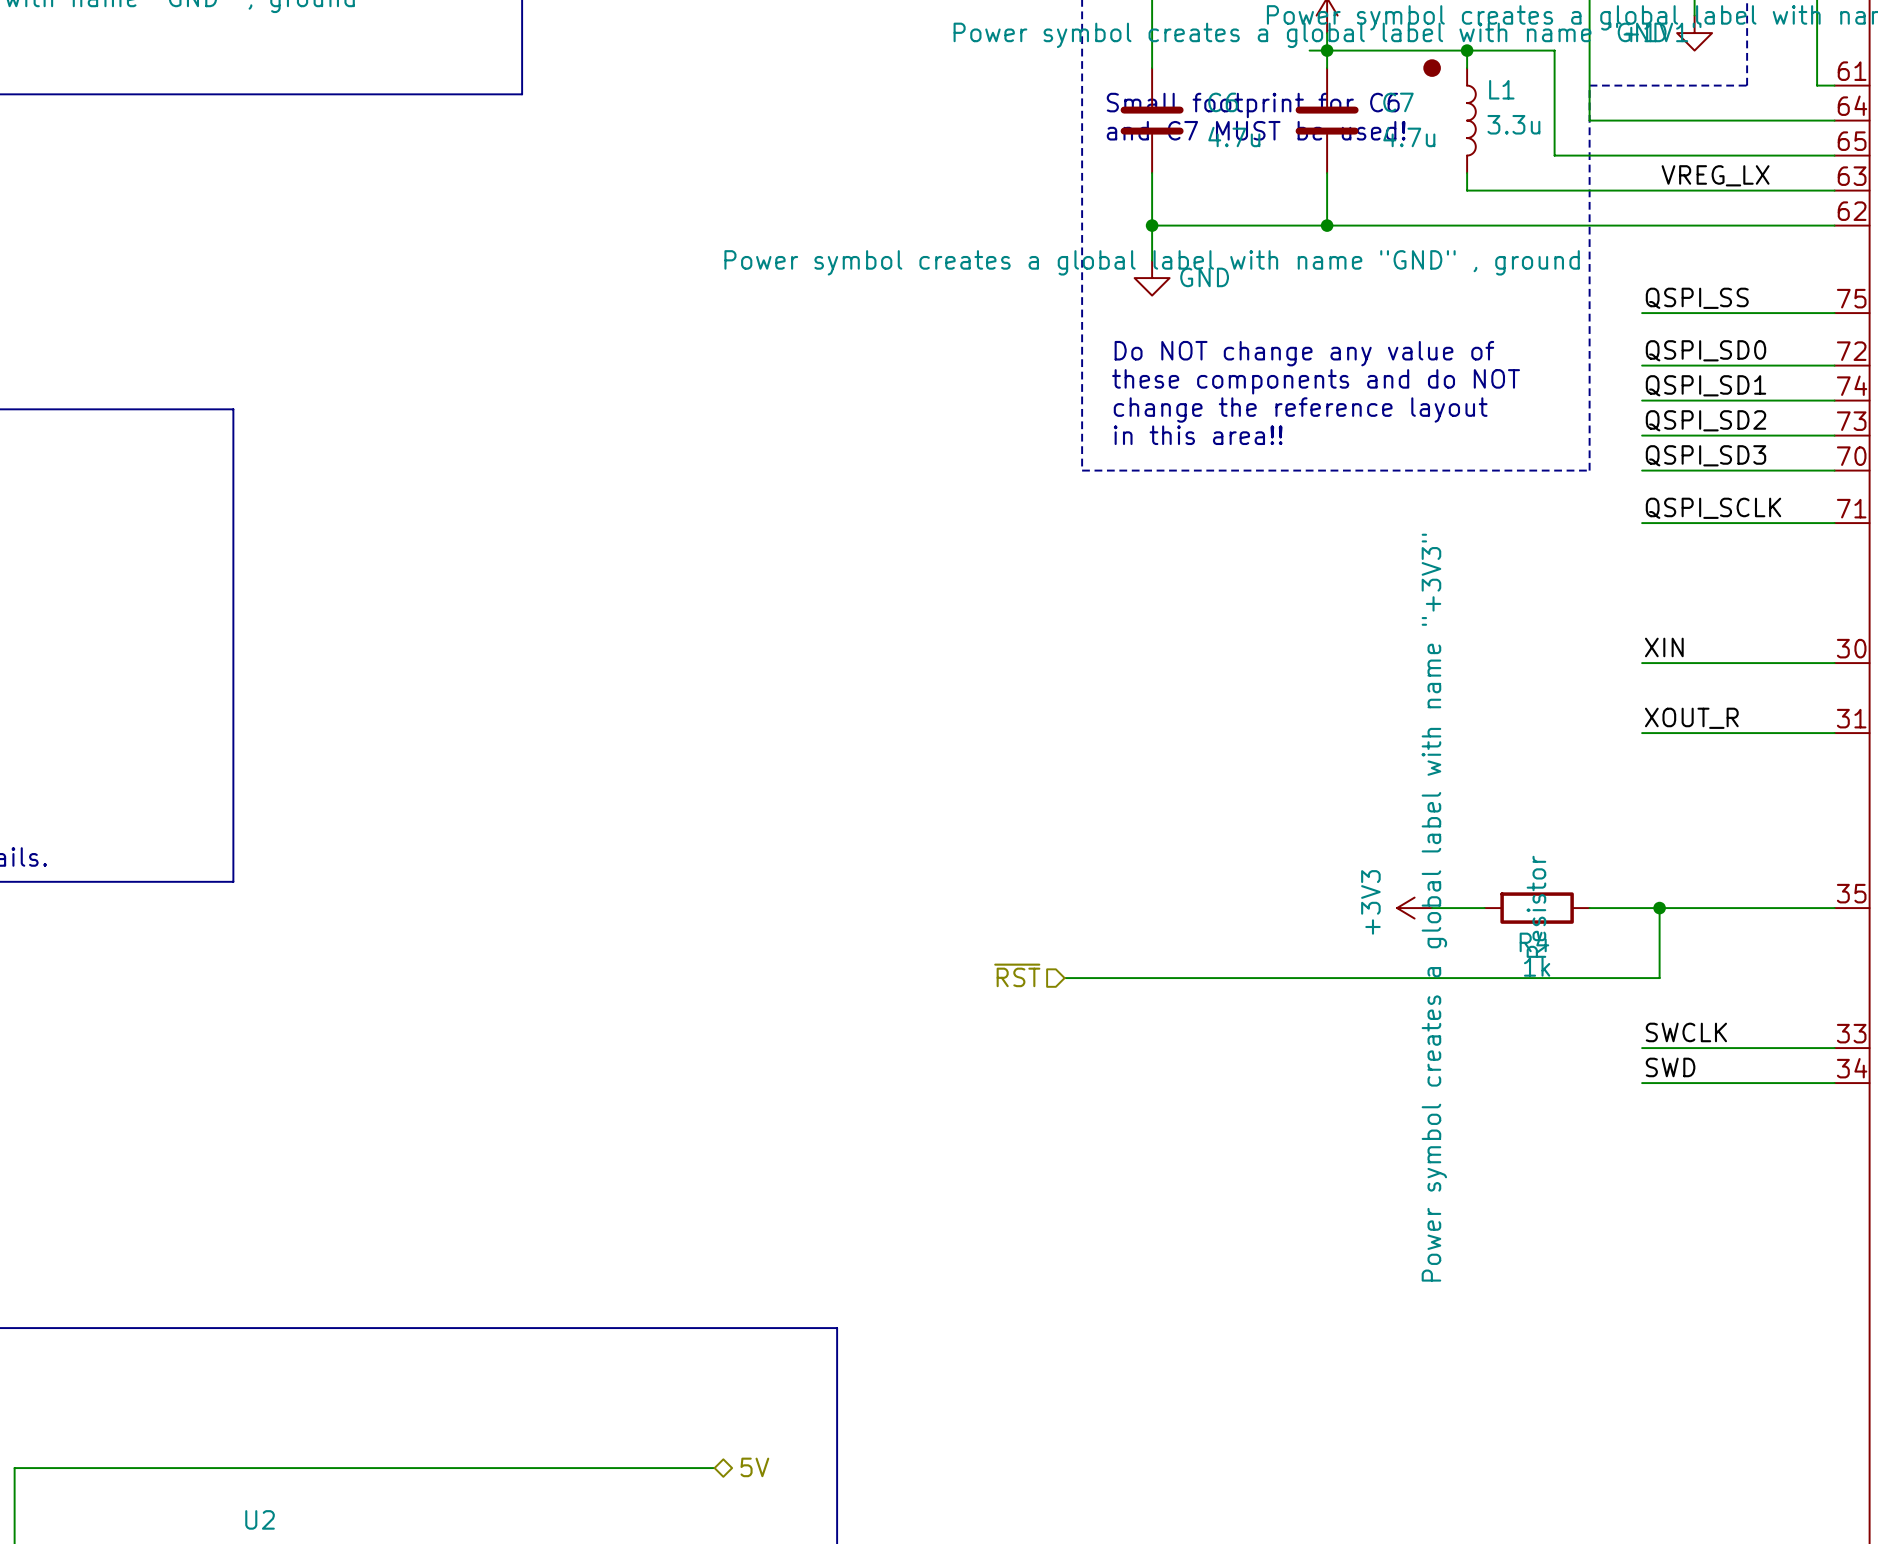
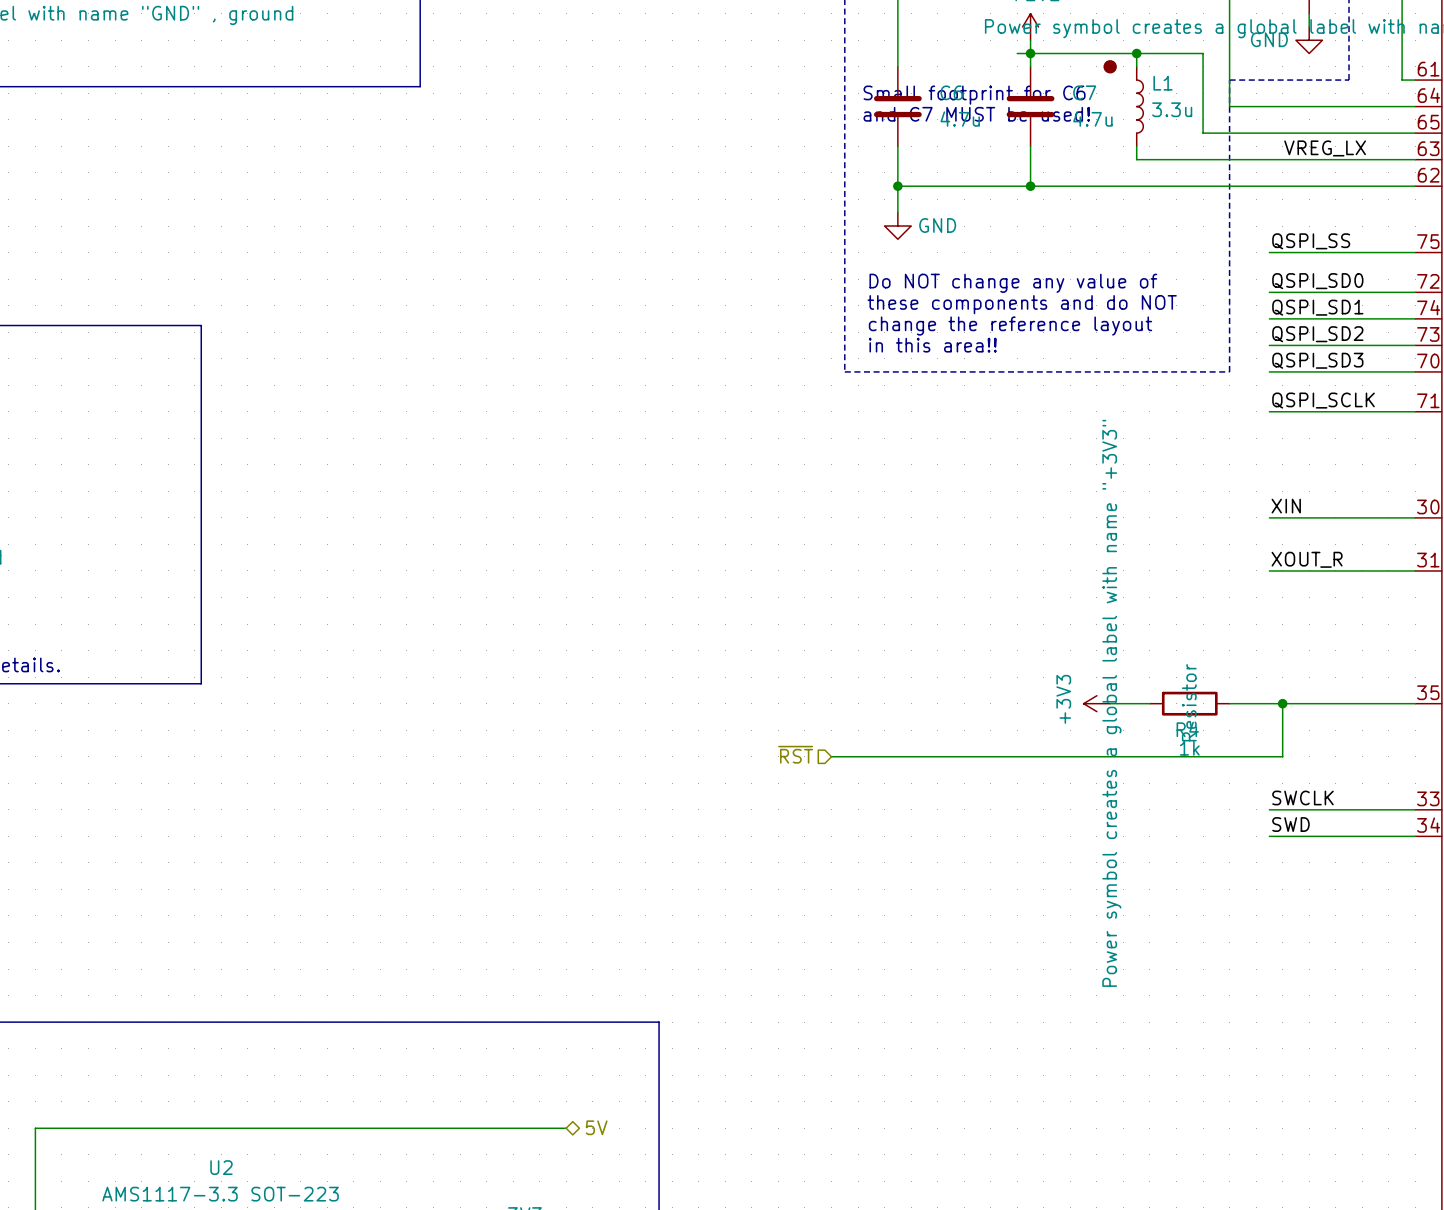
power symbol text: Power symbol creates a global label with name "+1V1" (1327, 35) -> none
power symbol text: Power symbol creates a global label with name "GND" , ground (1152, 262) -> none

